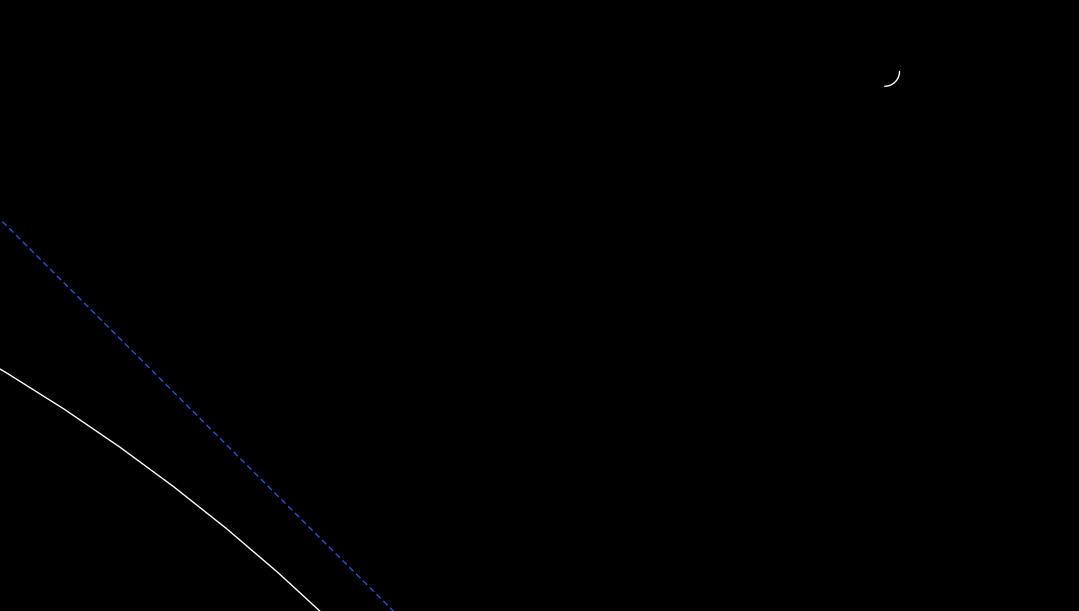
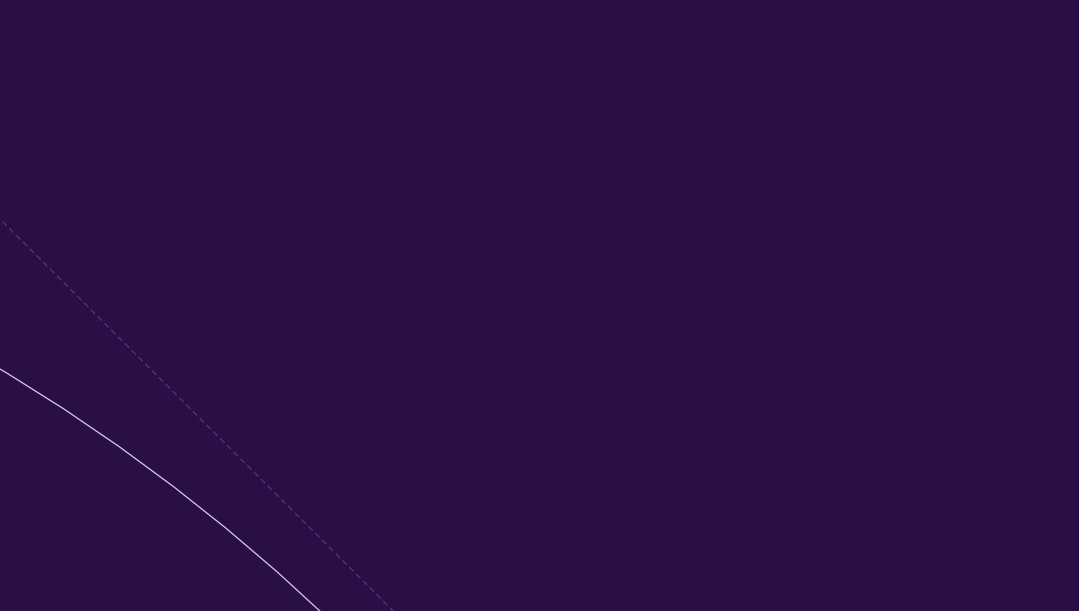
board edge: (899, 71) (895, 81) (884, 86) -> none

